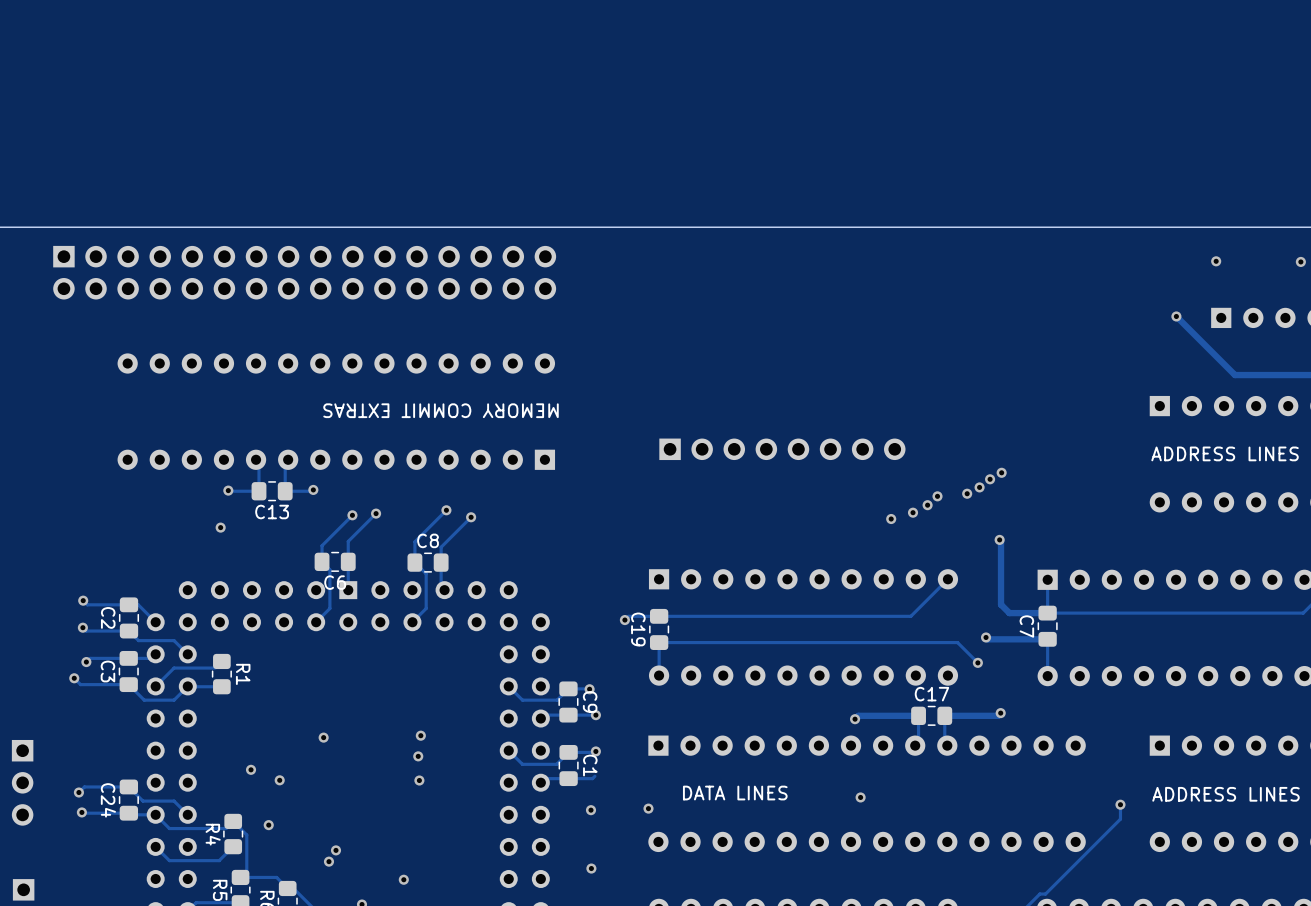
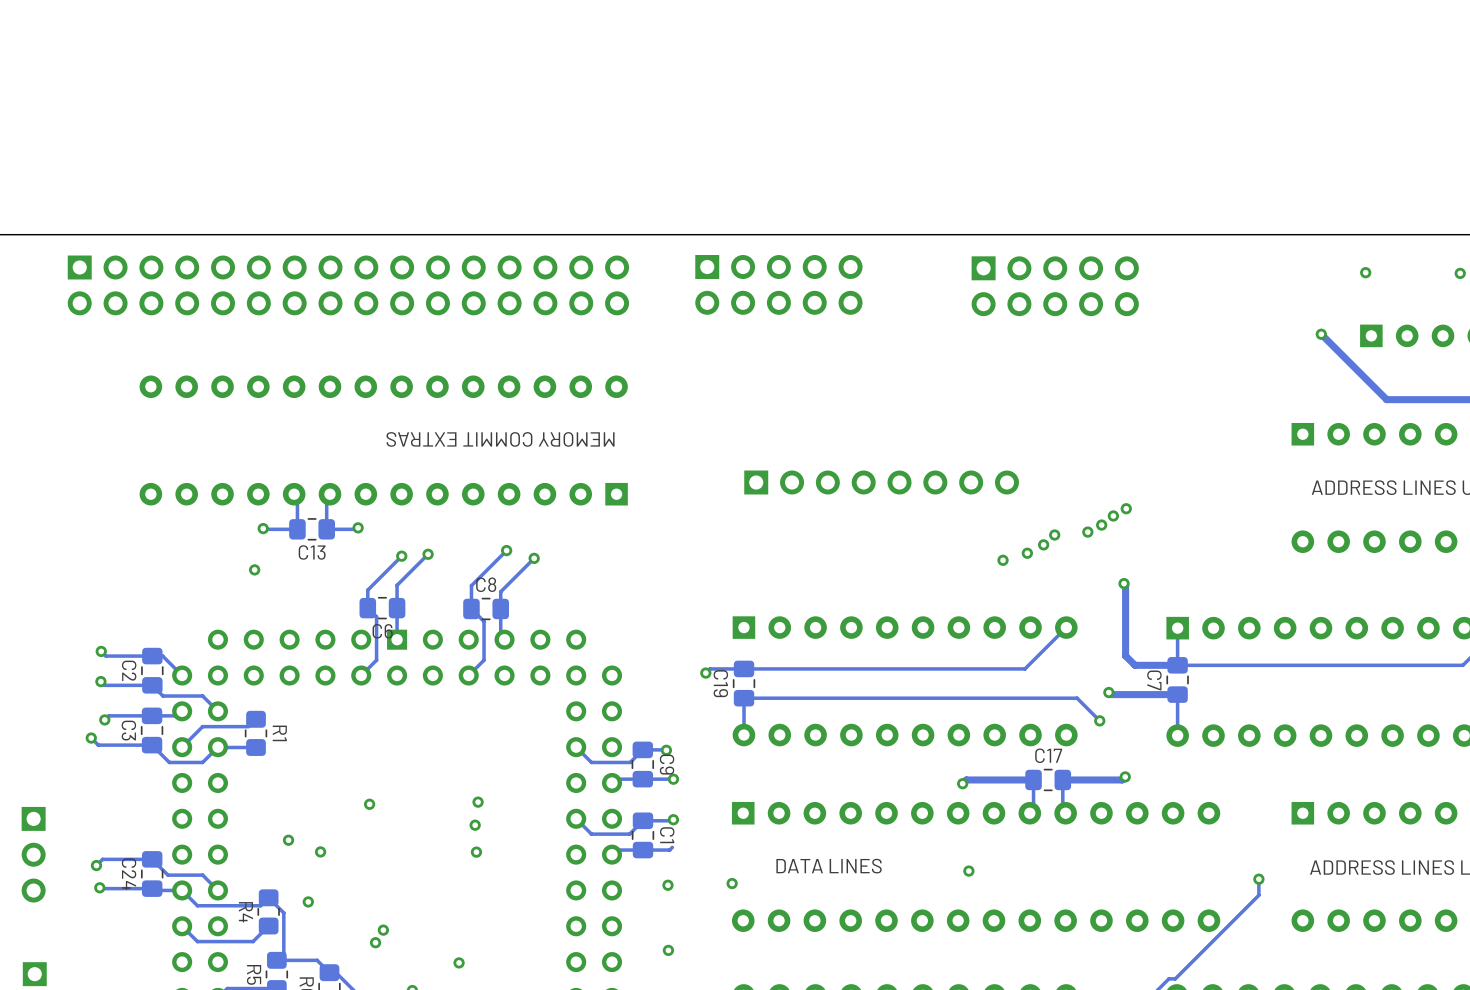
part: none -> (778, 284)
part: none -> (1055, 286)

